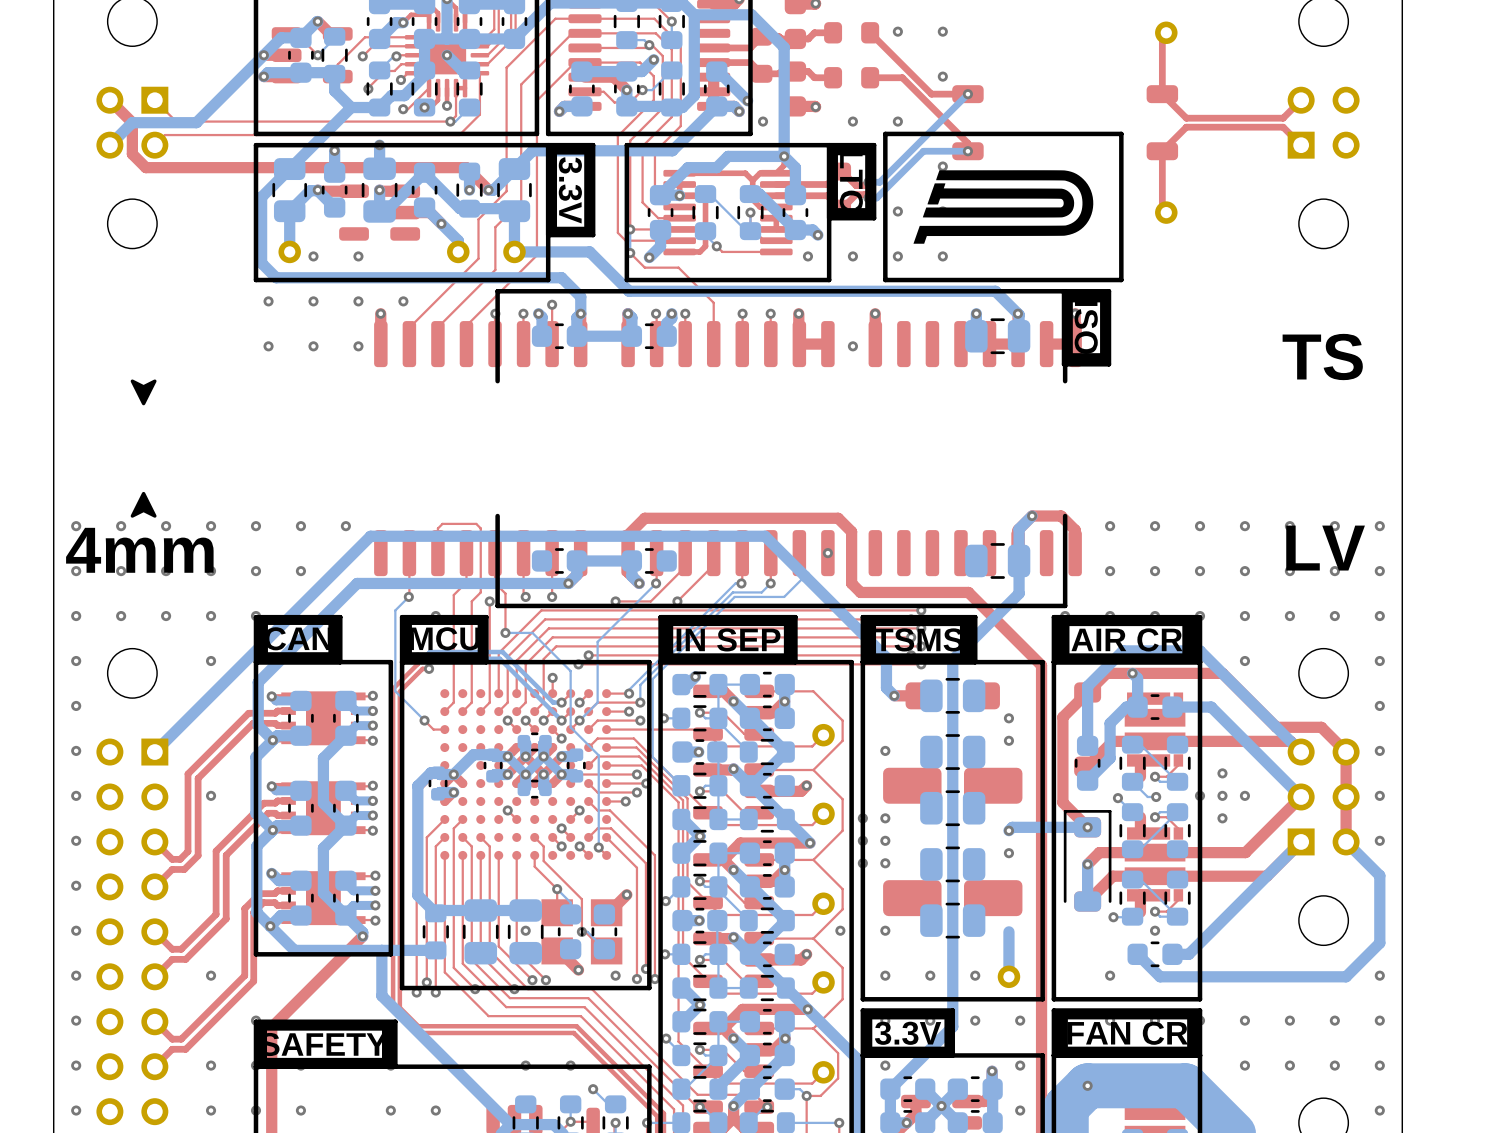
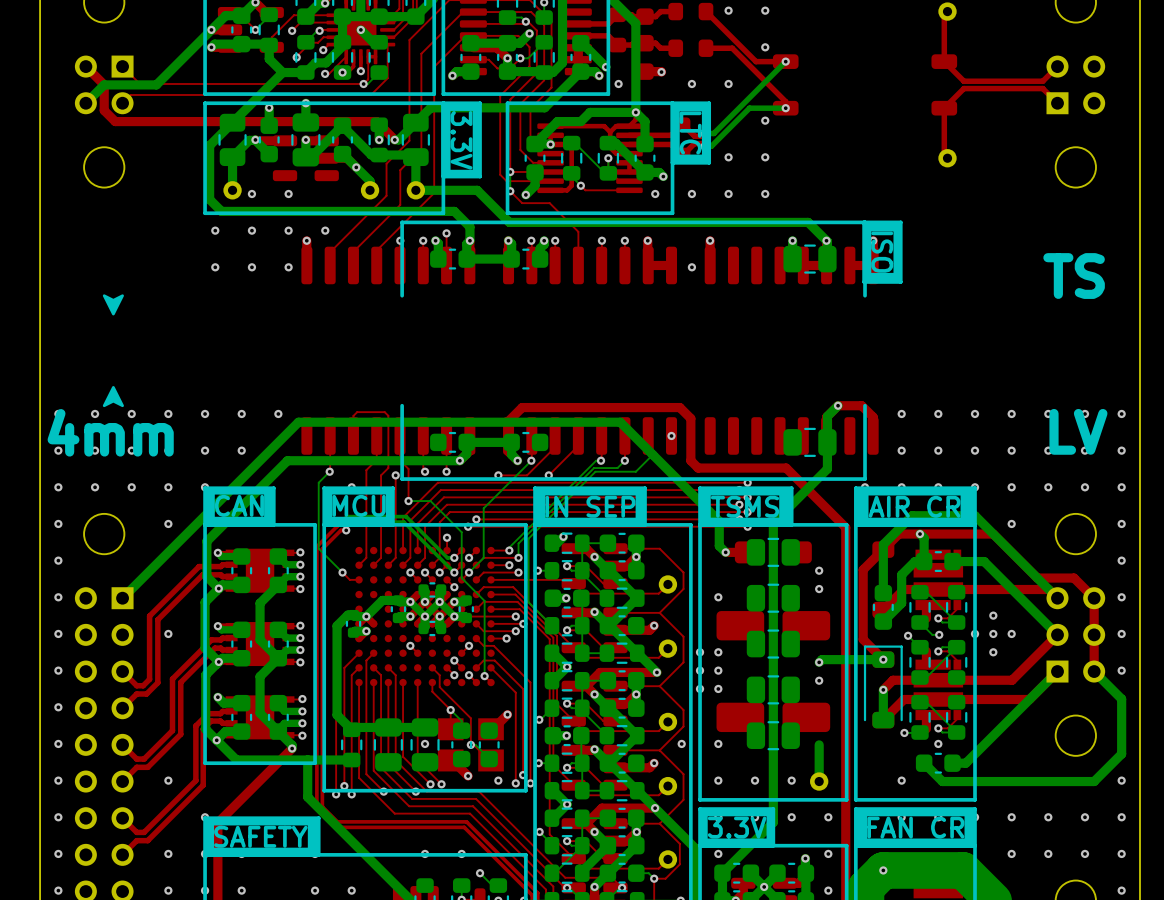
line: (1121, 133) (885, 133) (885, 280) (1121, 280) (1121, 133) -> none
drawing: [913, 170, 1094, 244] -> none

